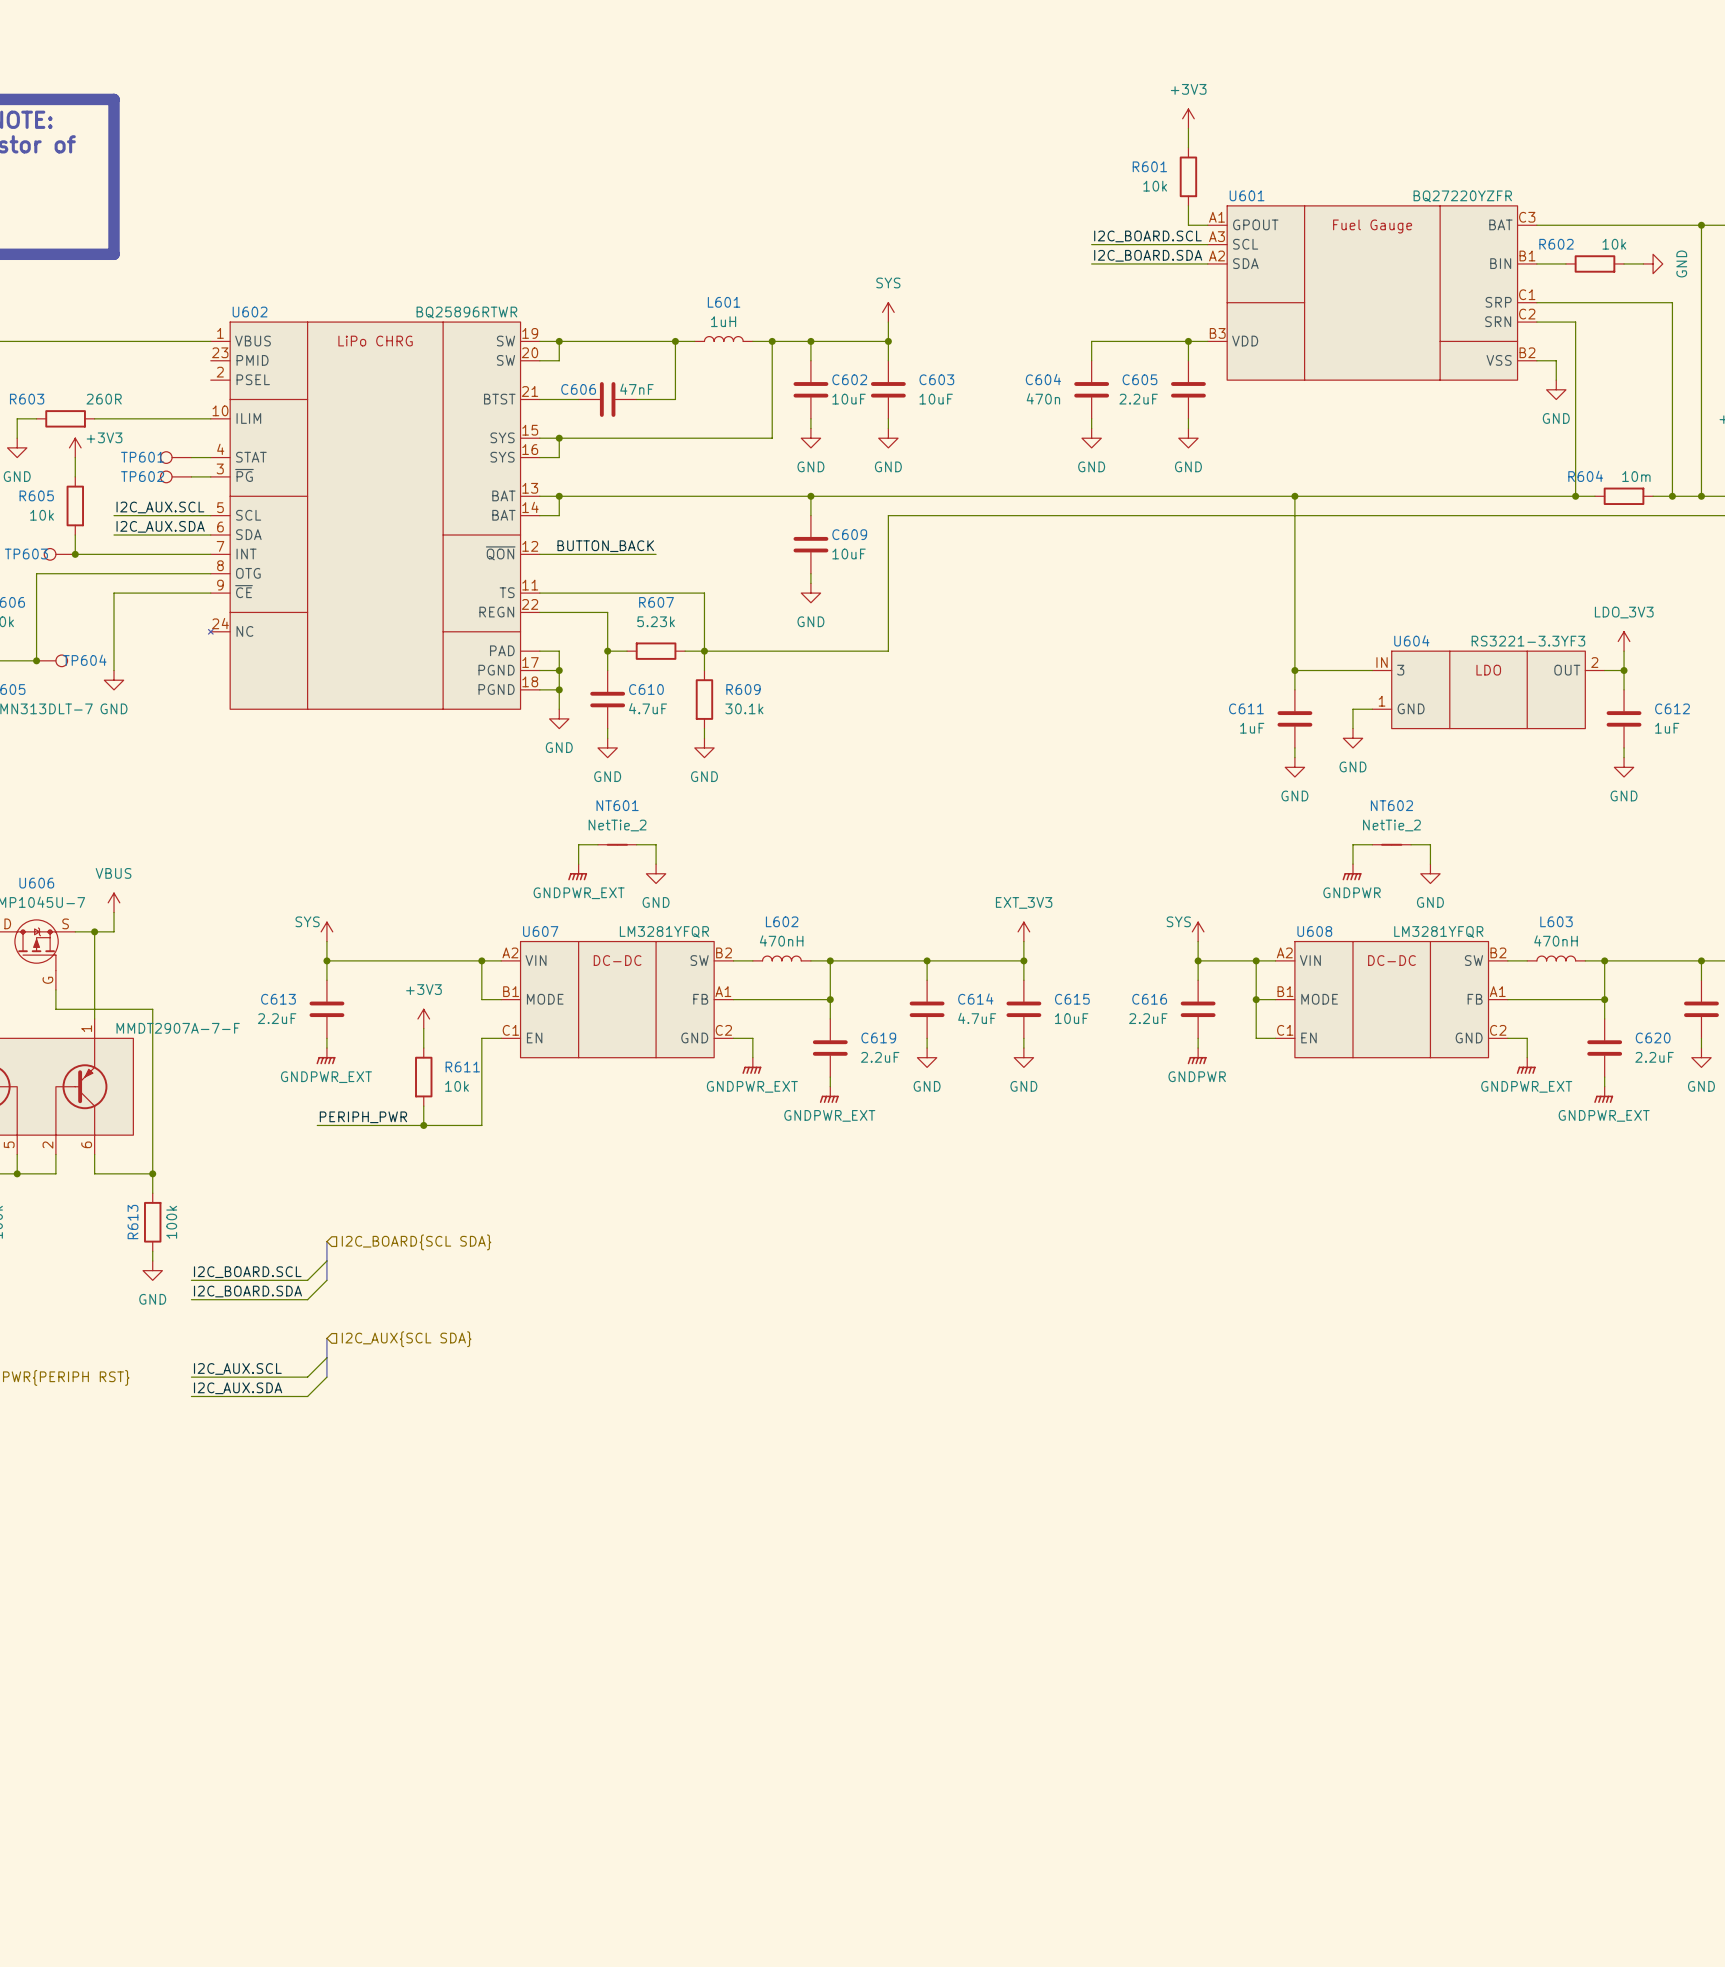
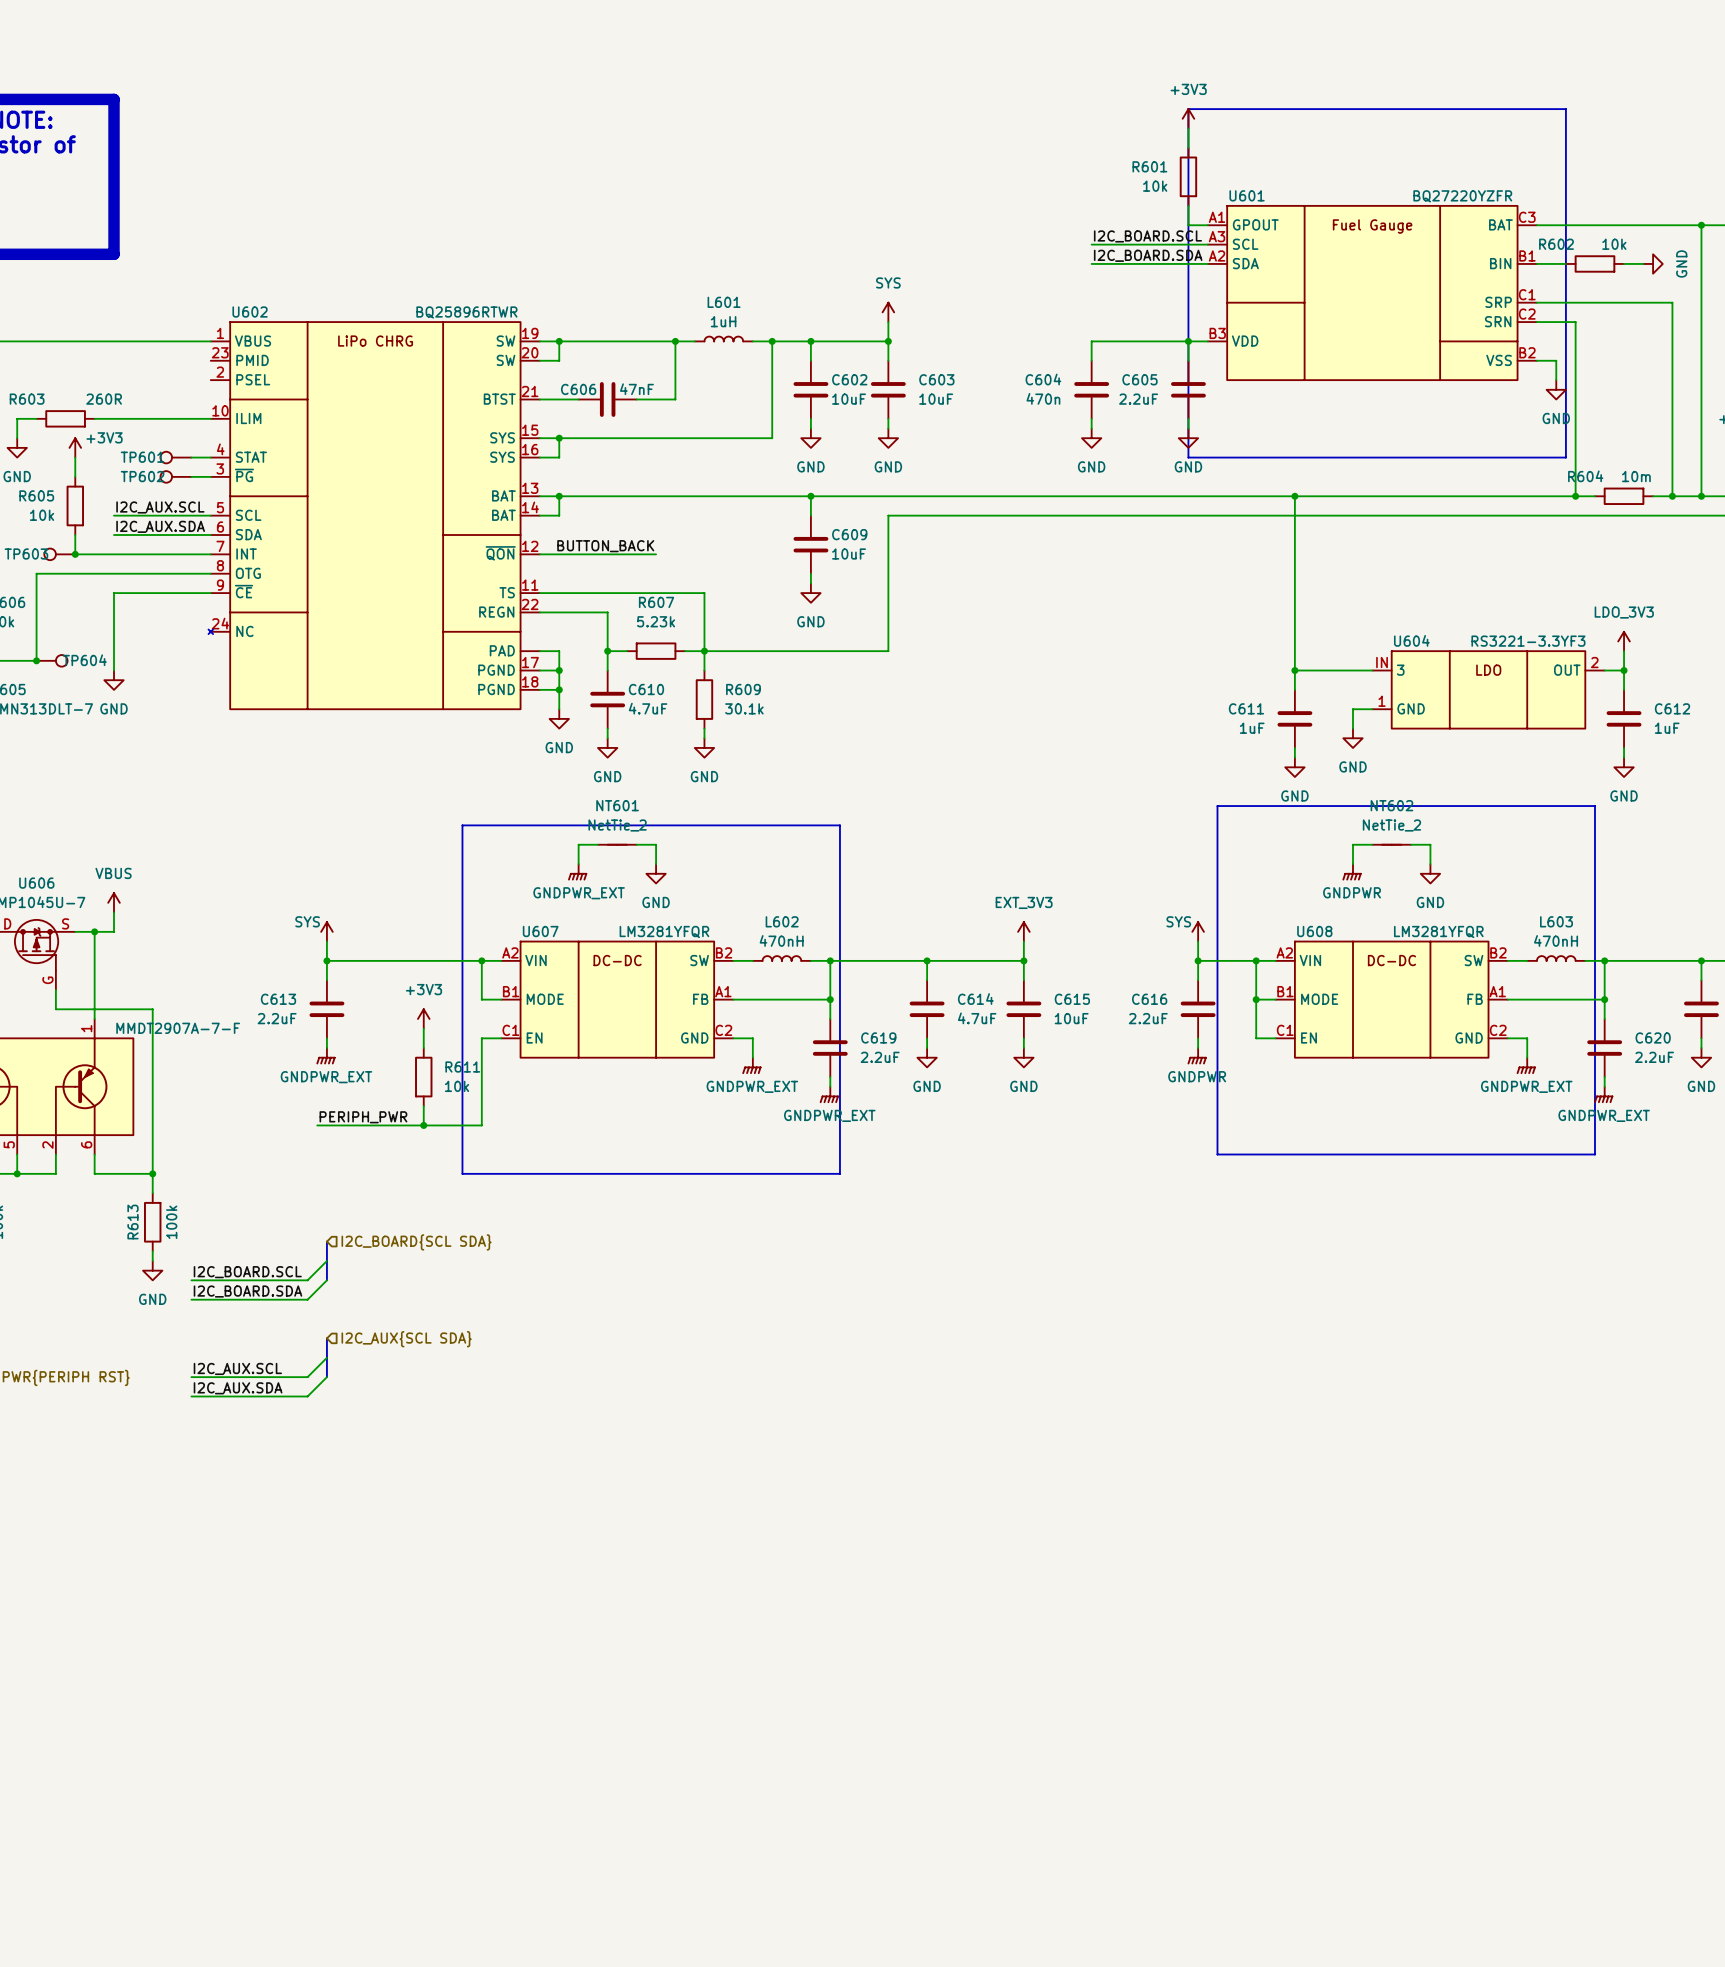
line: none -> (1188, 109) (1565, 109) (1565, 457) (1188, 457) (1188, 109)
line: none -> (1217, 806) (1594, 806) (1594, 1154) (1217, 1154) (1217, 806)
line: none -> (462, 825) (839, 825) (839, 1173) (462, 1173) (462, 825)

